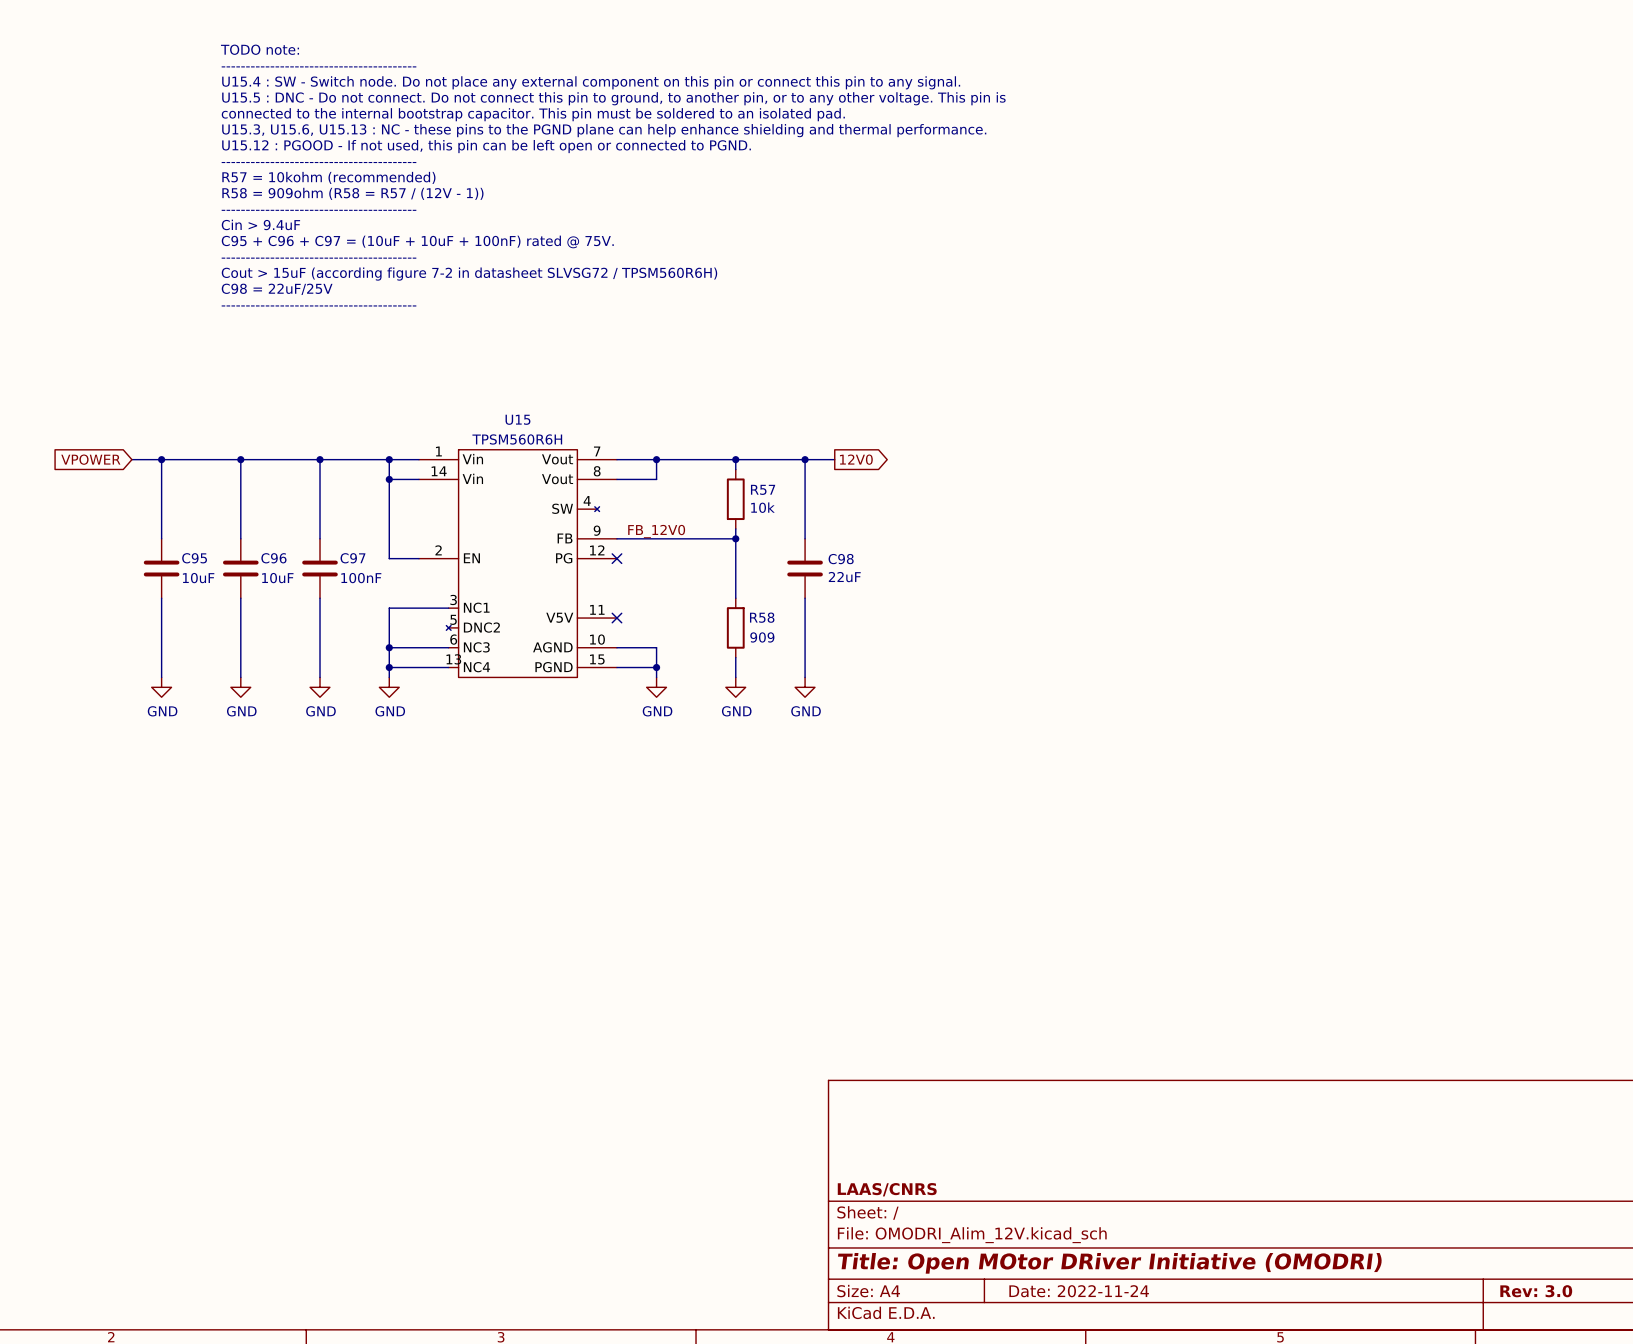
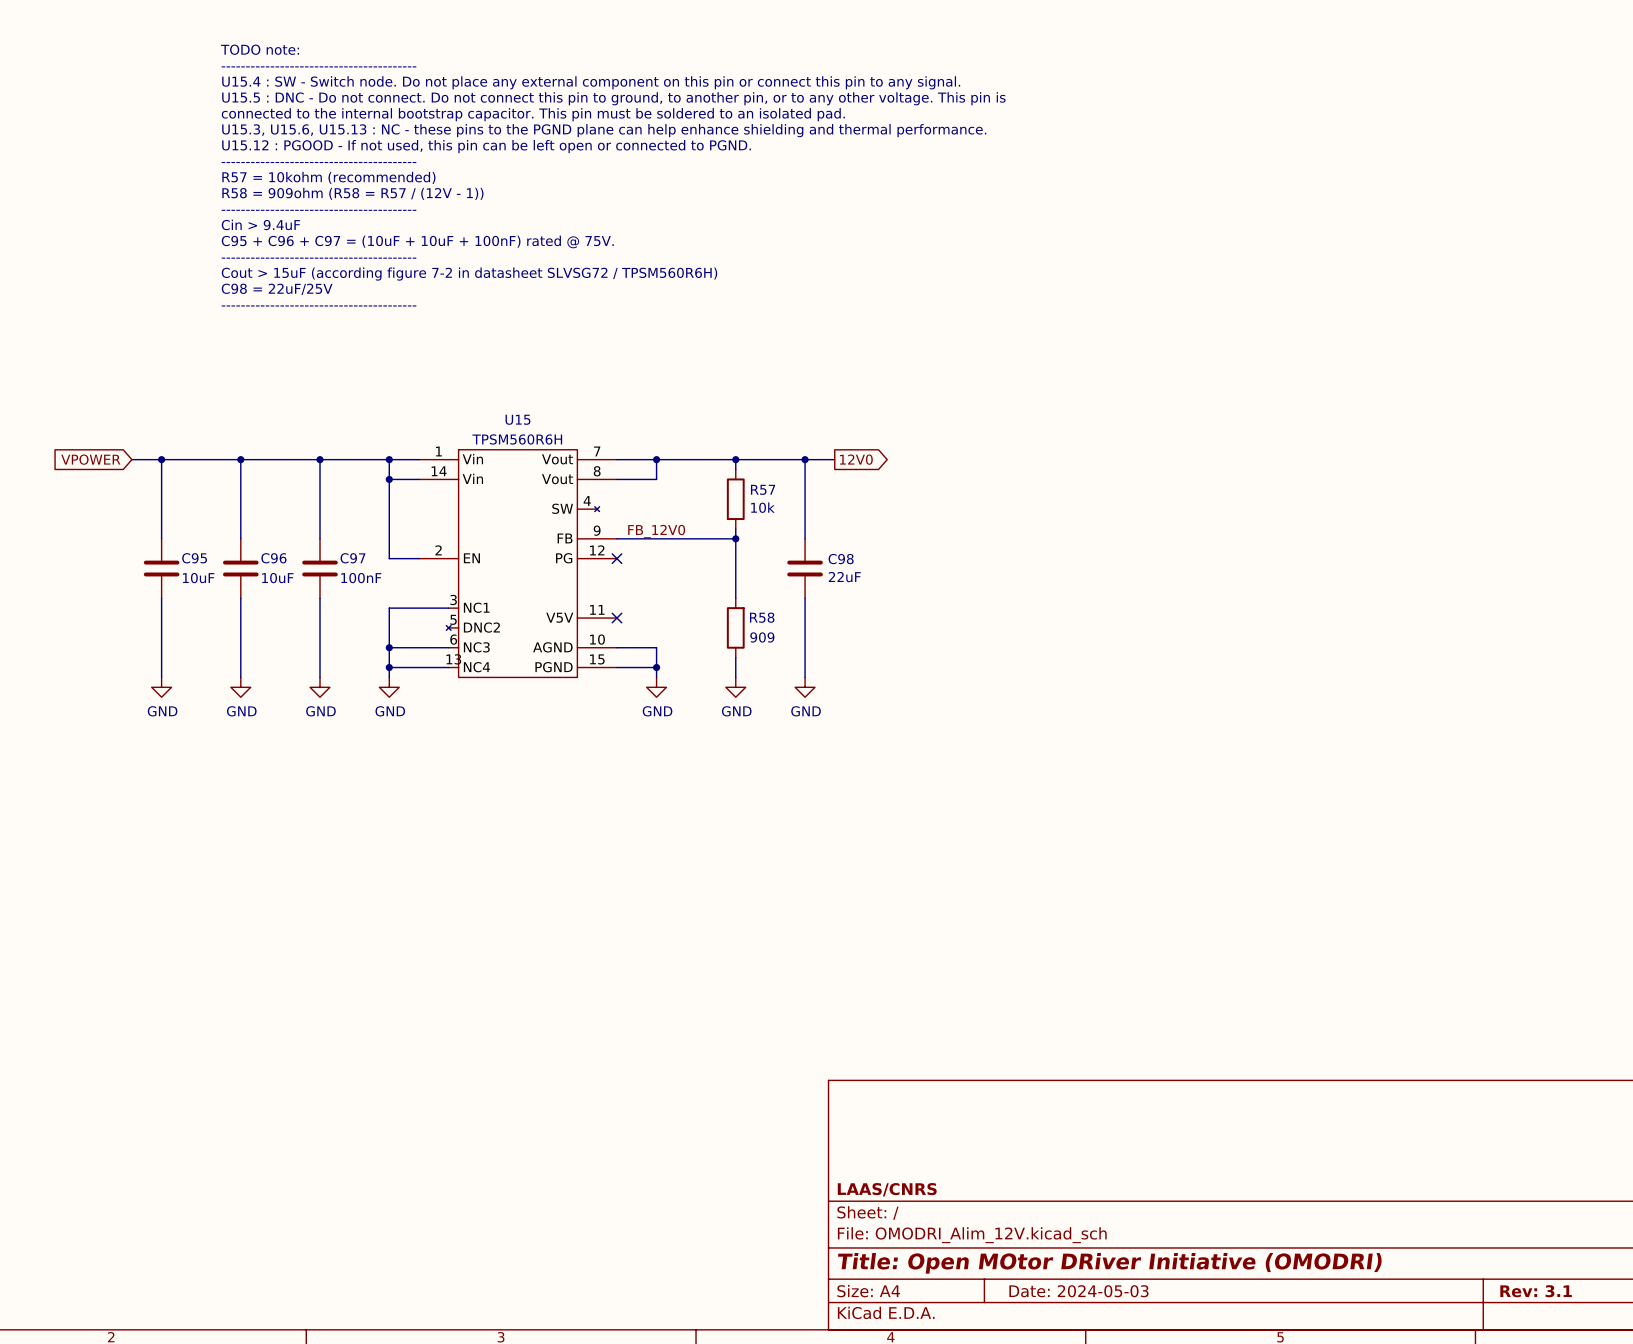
title block: Date: 2022-11-24 (1079, 1291) -> Date: 2024-05-03 (1078, 1291)
title block: Rev: 3.0 (1536, 1291) -> Rev: 3.1 (1536, 1291)

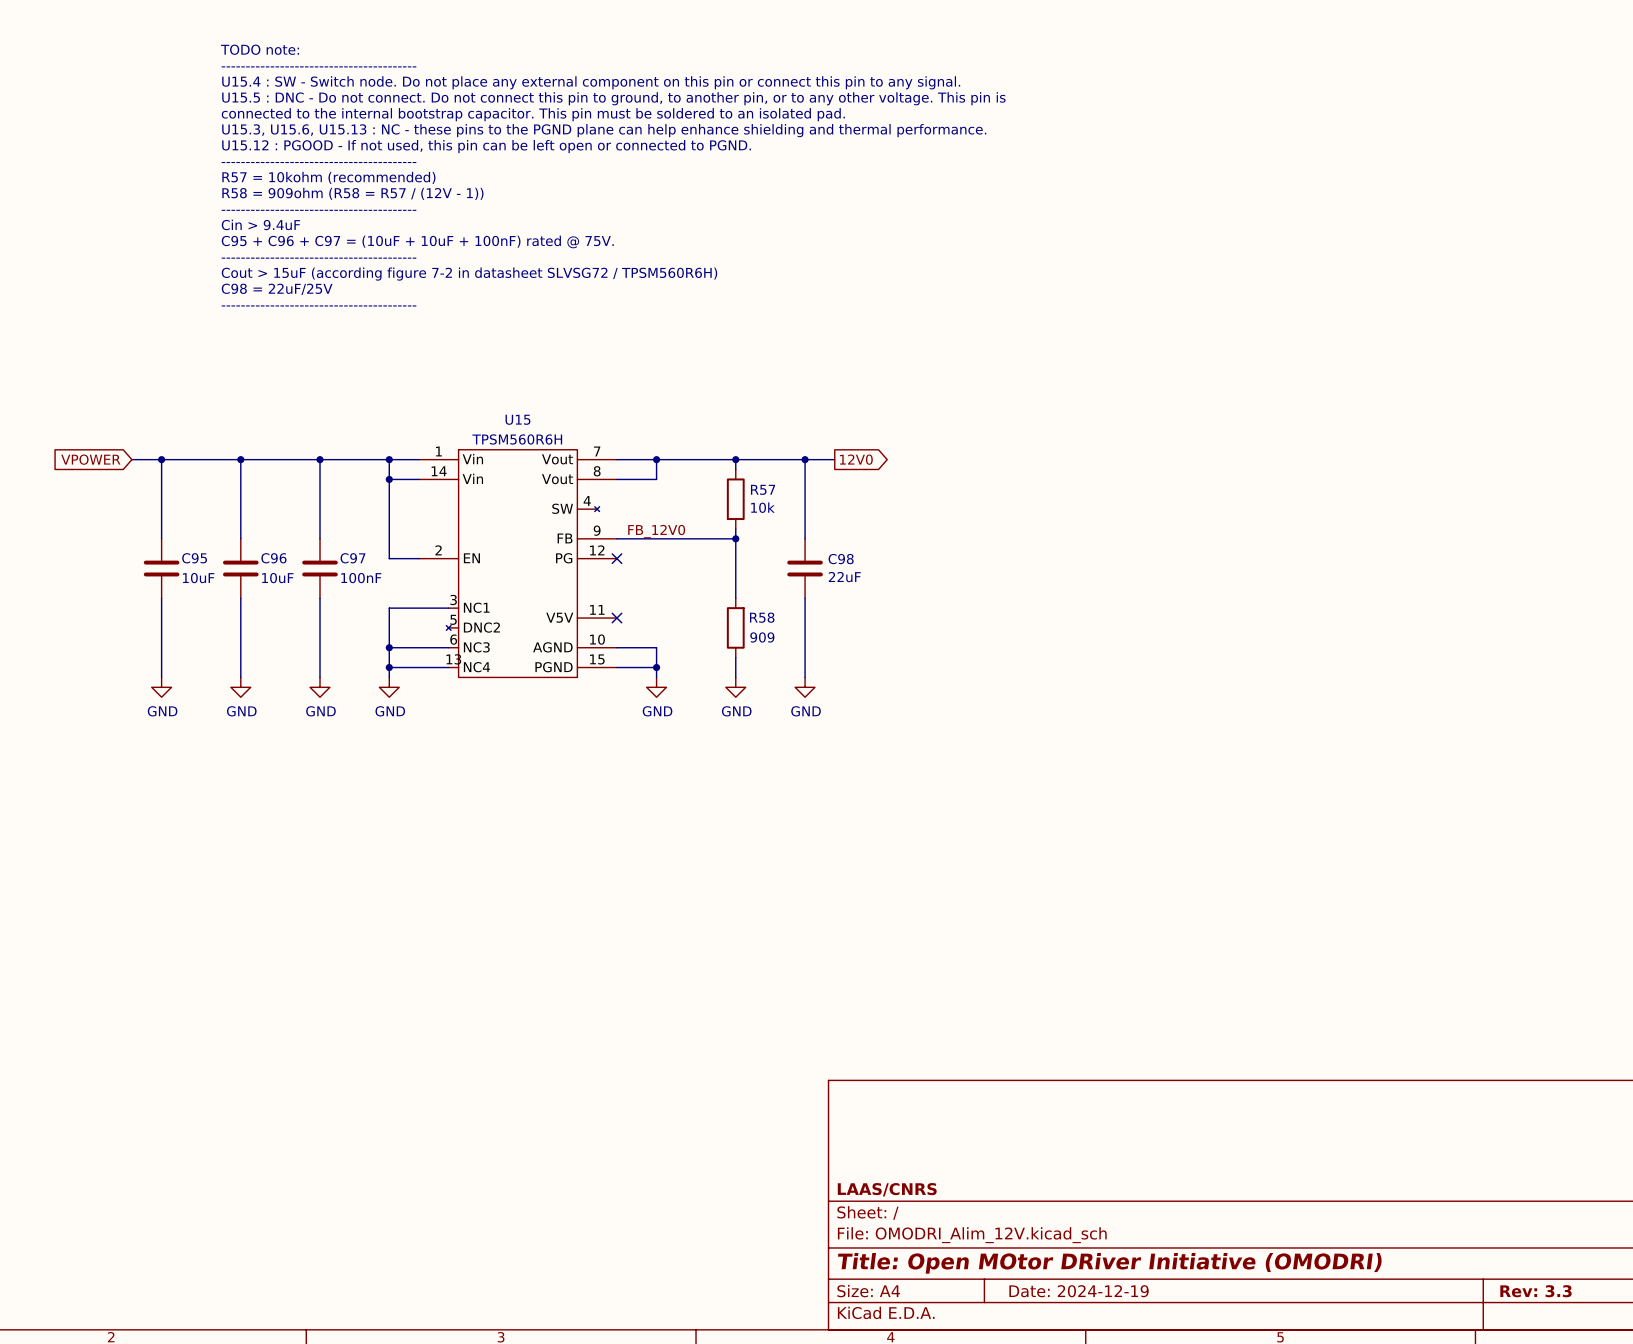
title block: Date: 2024-05-03 (1078, 1291) -> Date: 2024-12-19 (1079, 1291)
title block: Rev: 3.1 (1536, 1291) -> Rev: 3.3 (1535, 1291)

